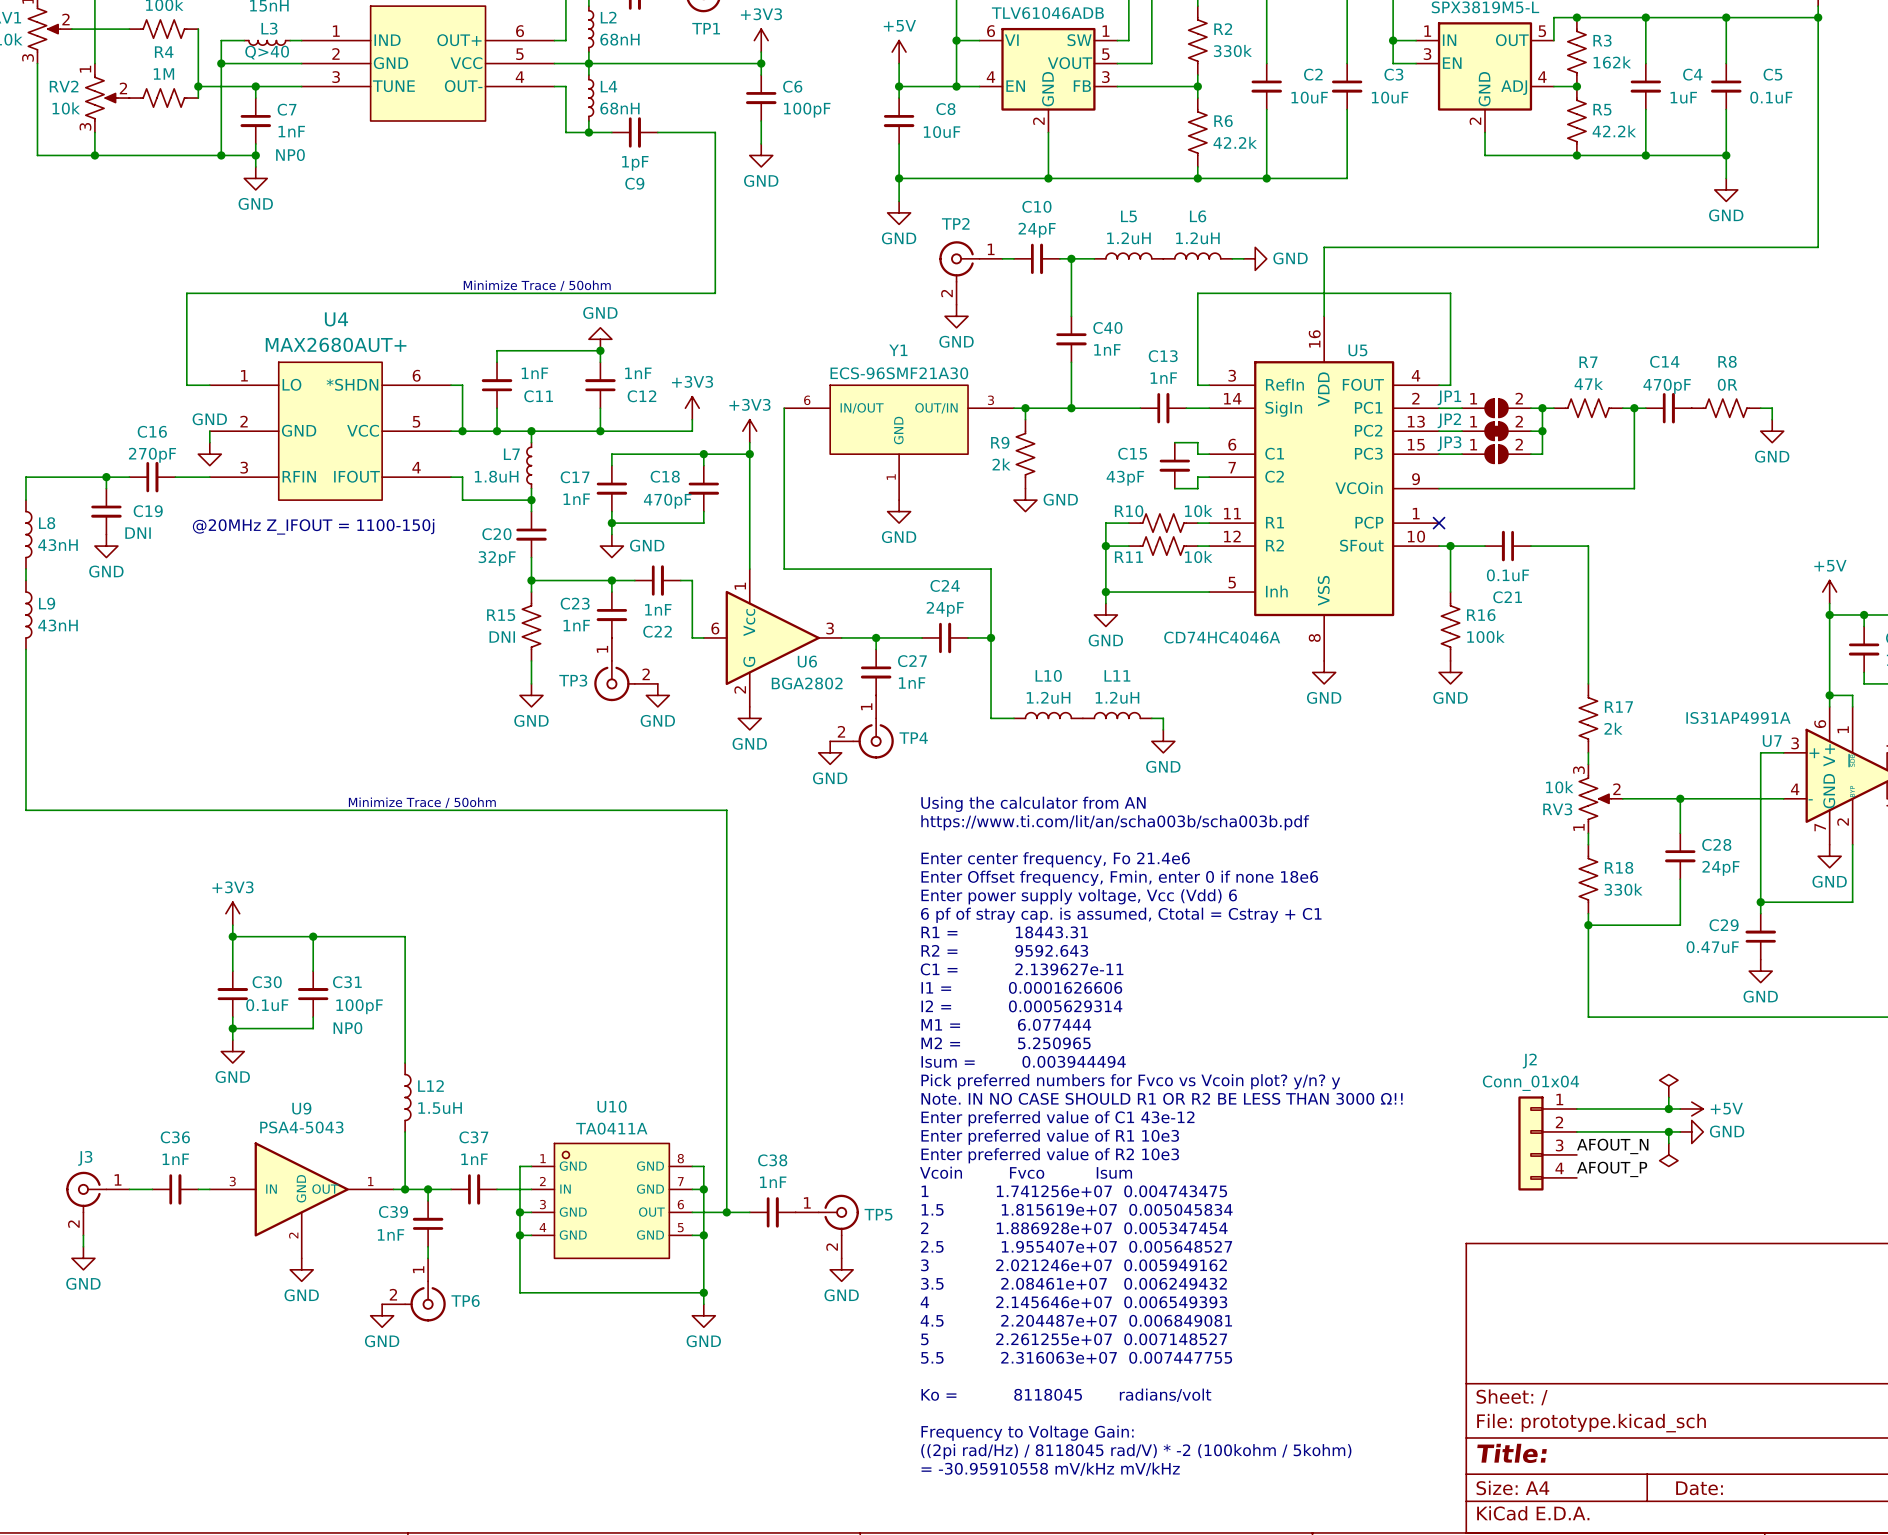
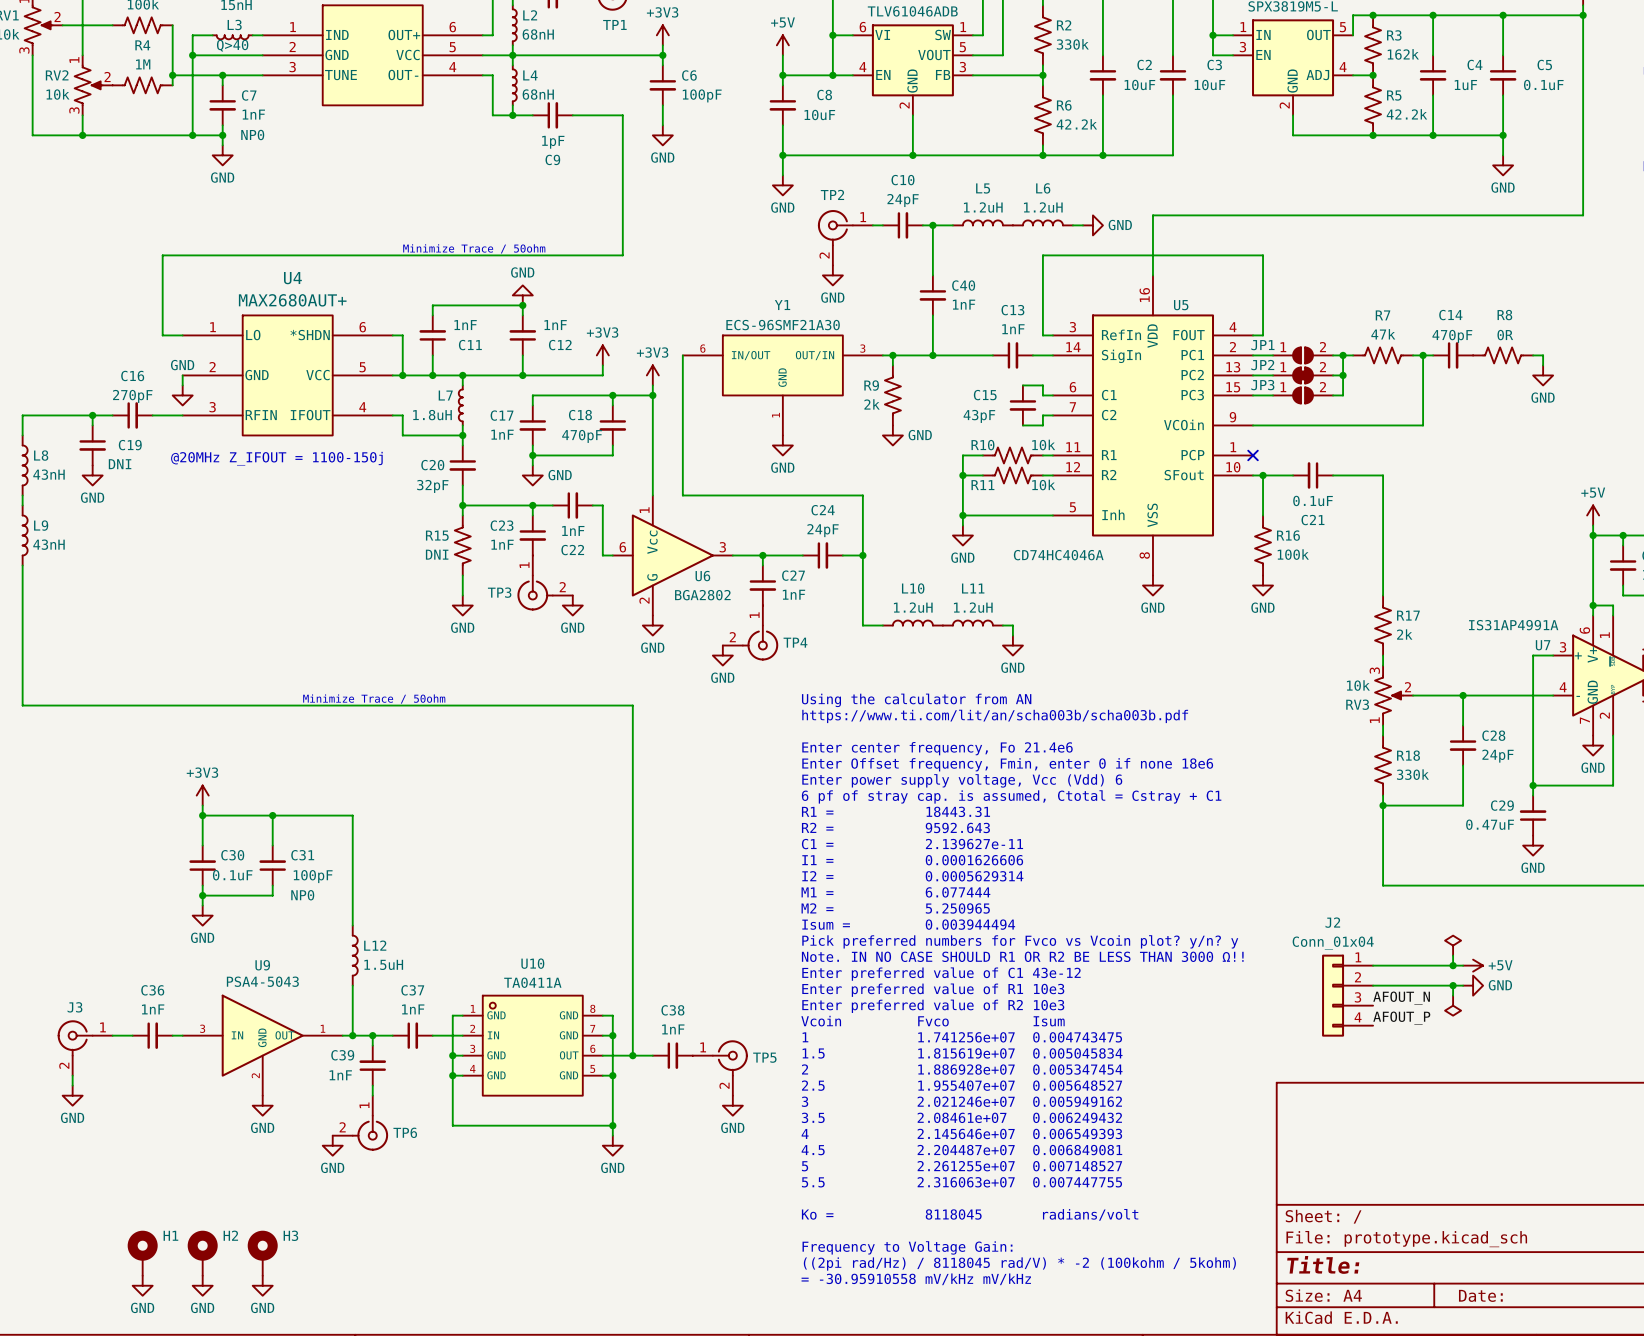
H1: none -> (142, 1253)
H2: none -> (202, 1253)
H3: none -> (262, 1253)
power symbol: none -> GND (142, 1285)
power symbol: none -> GND (202, 1285)
power symbol: none -> GND (262, 1285)

